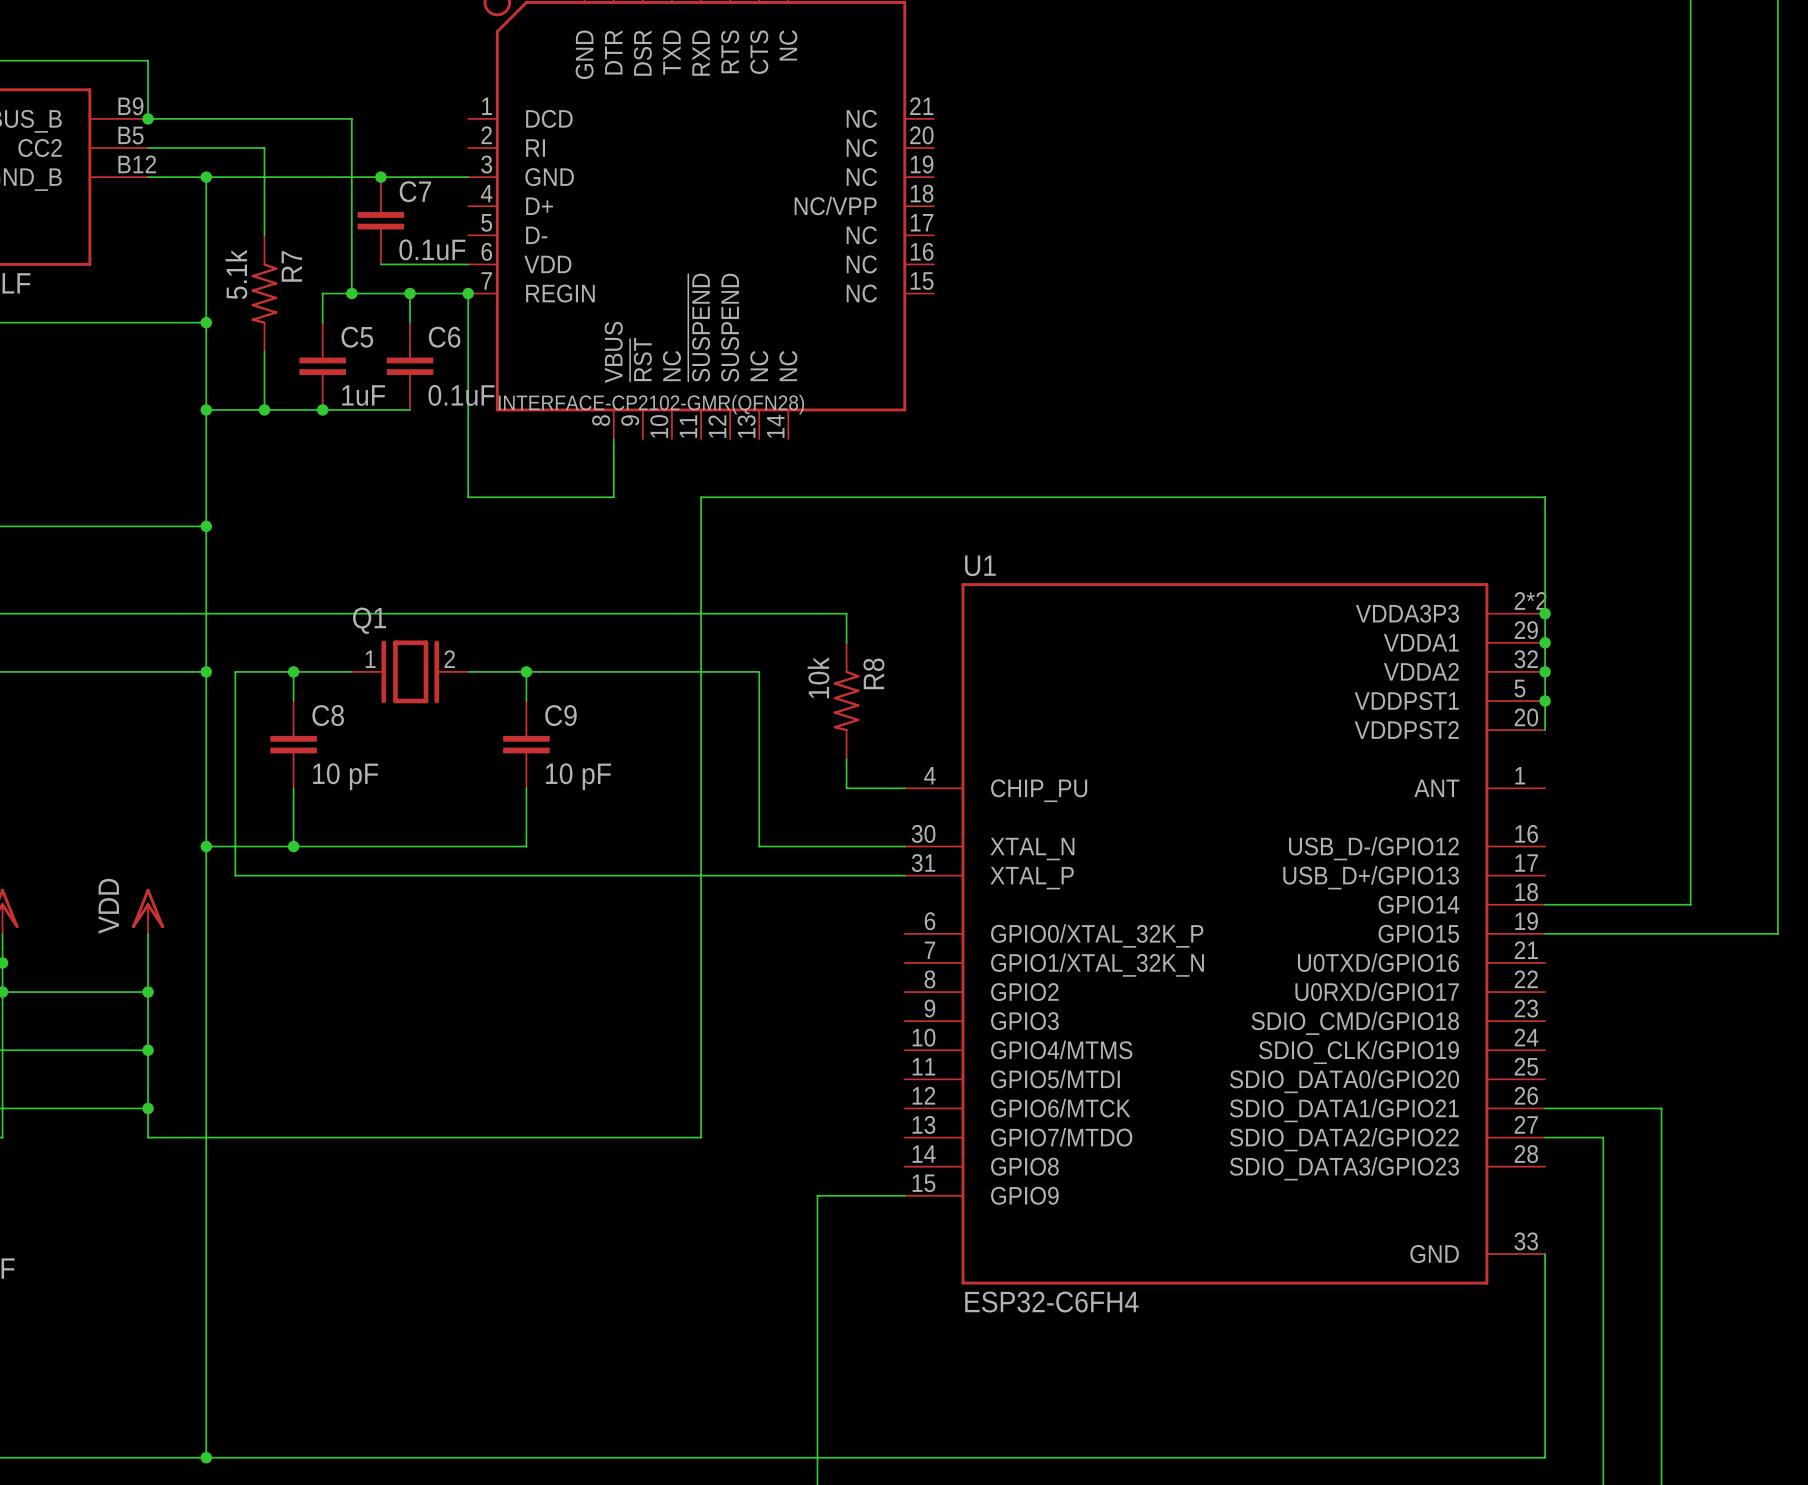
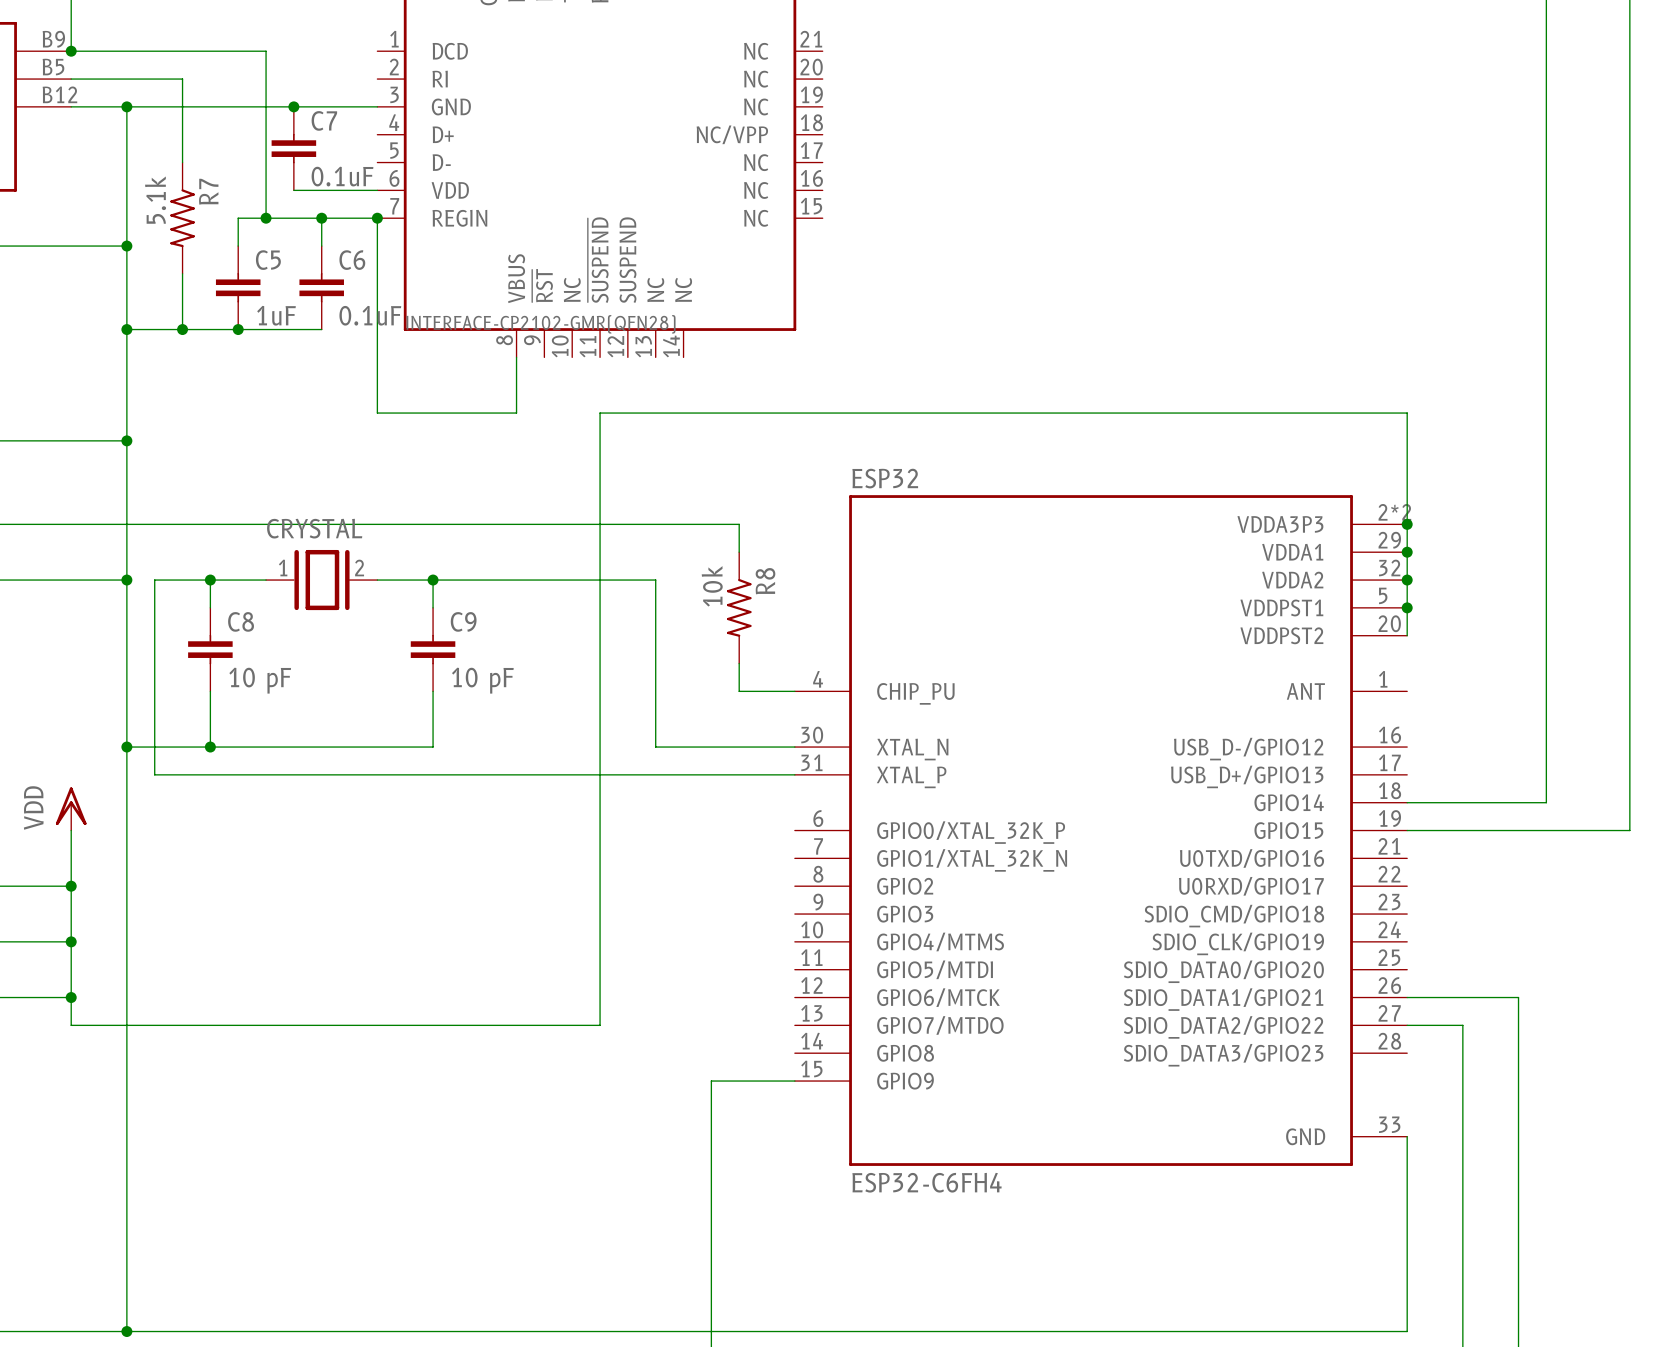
U1 name: U1 (980, 565) -> ESP32 (885, 478)
Q1 name: Q1 (369, 620) -> CRYSTAL (314, 528)

